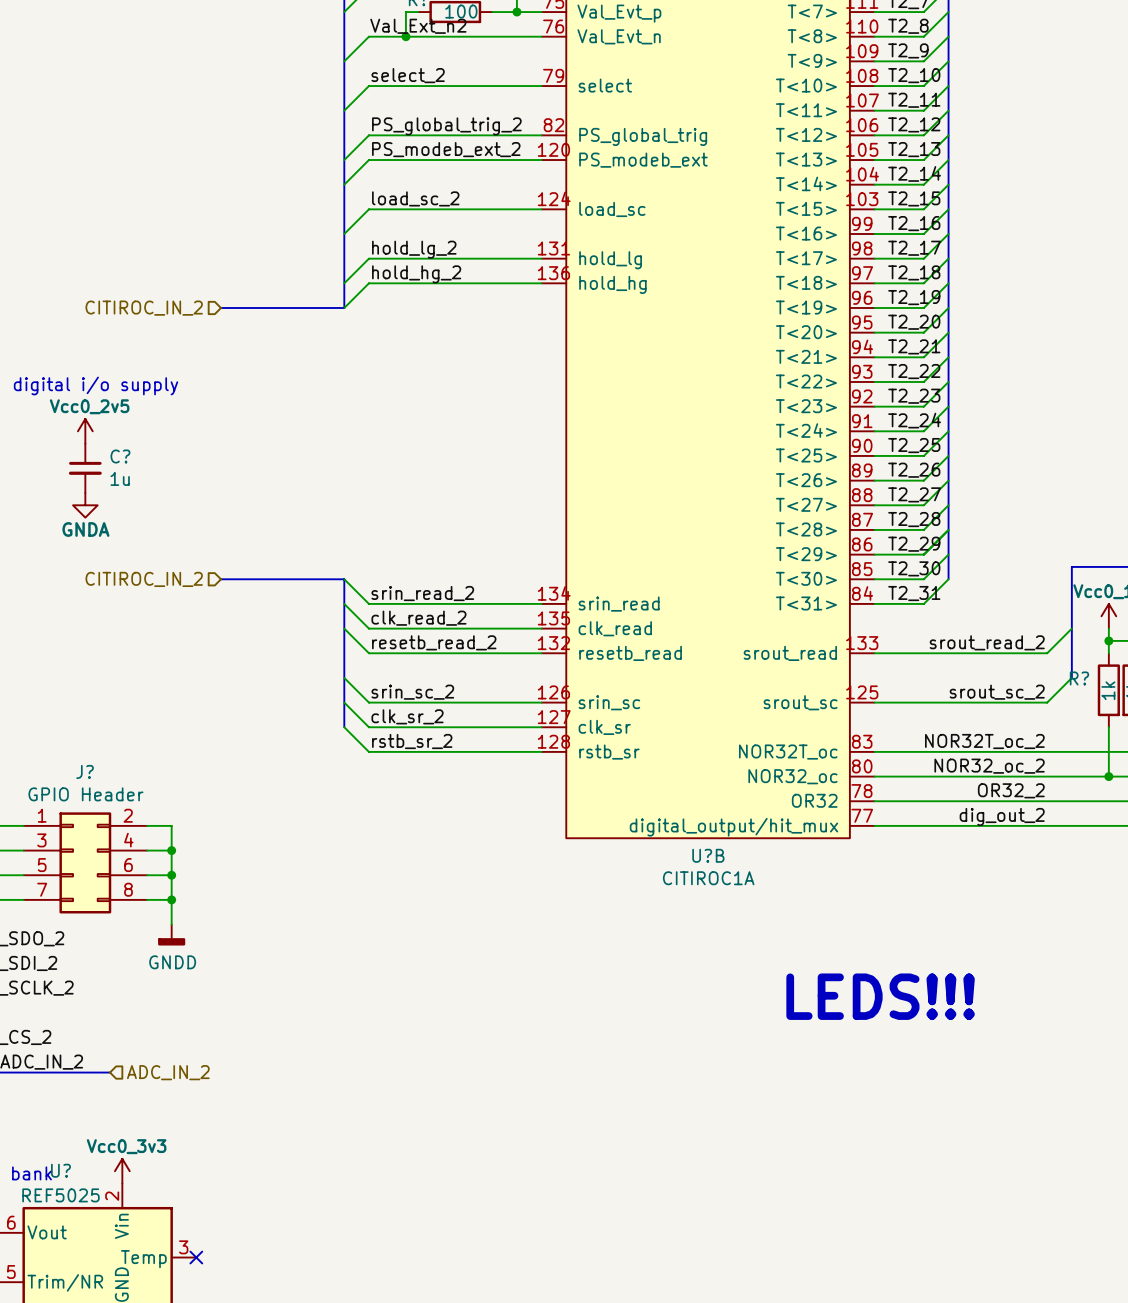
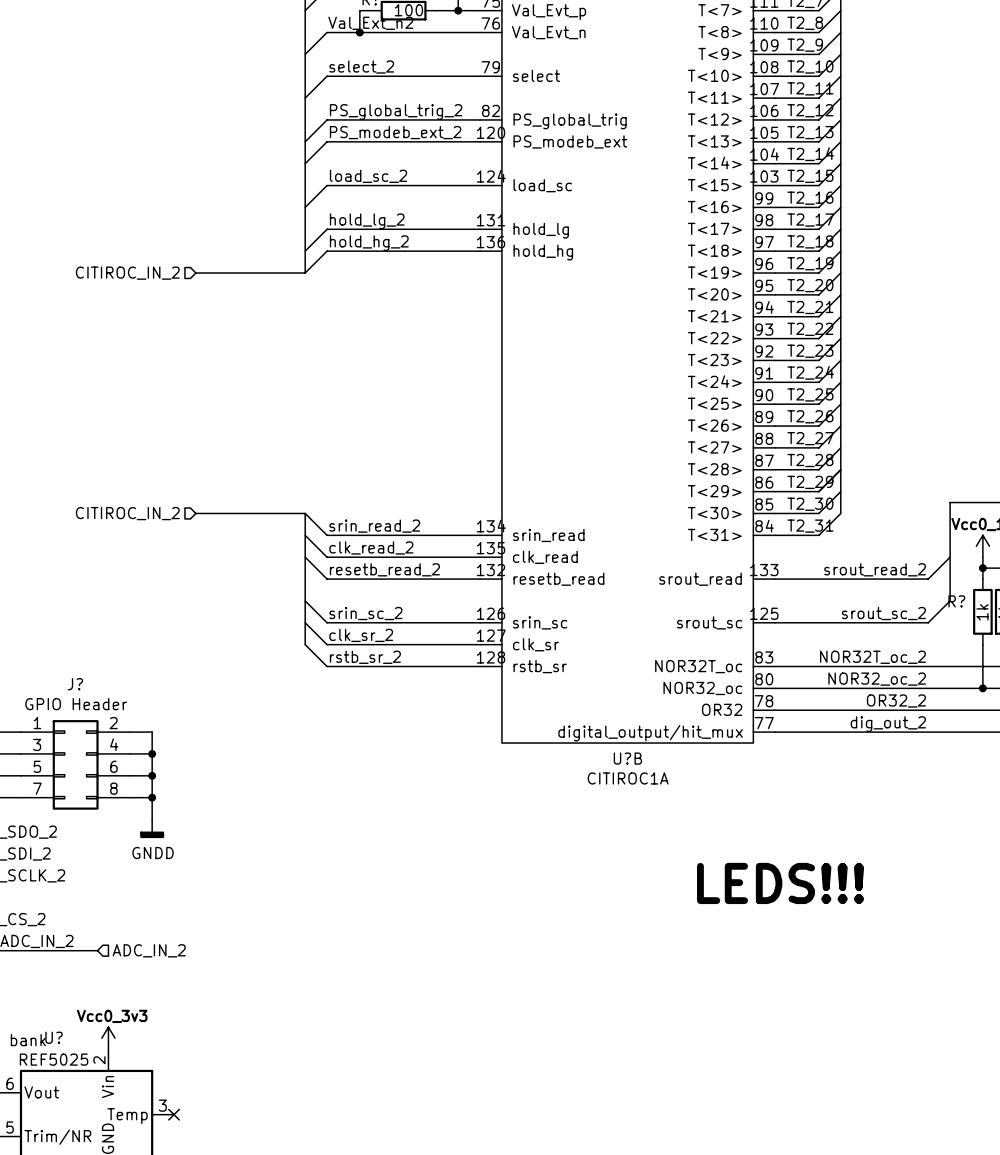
text: digital i/o supply (96, 385) -> none
part: Vcc0_2v5 (85, 431) -> none
C?: 1u (85, 468) -> none
power symbol: GNDA (85, 505) -> none

